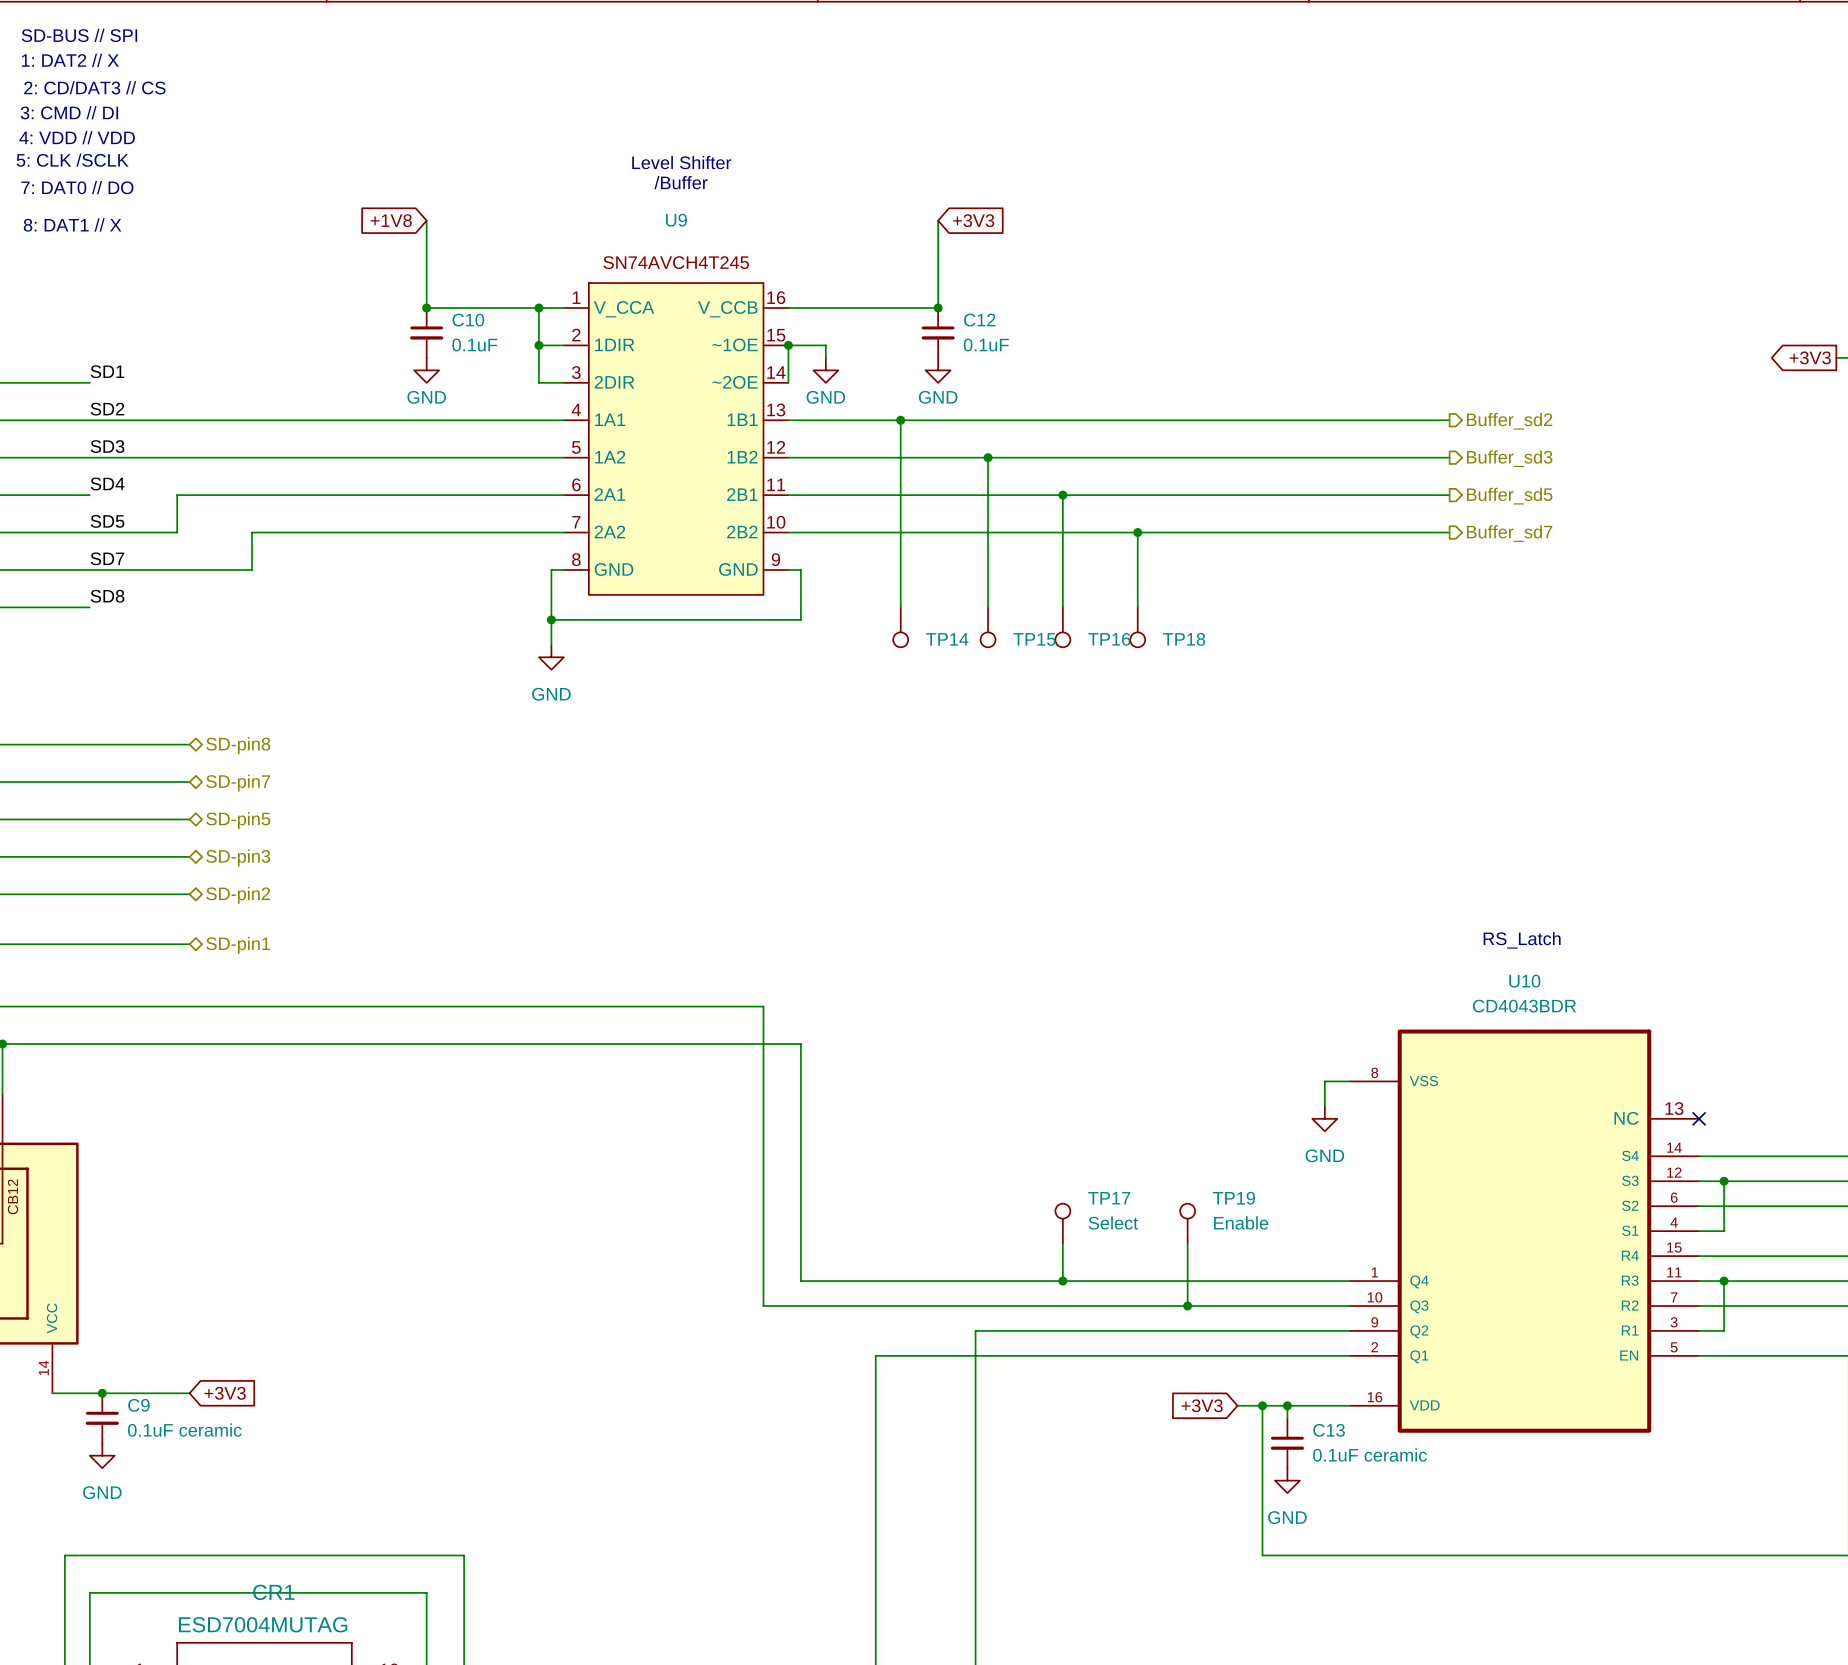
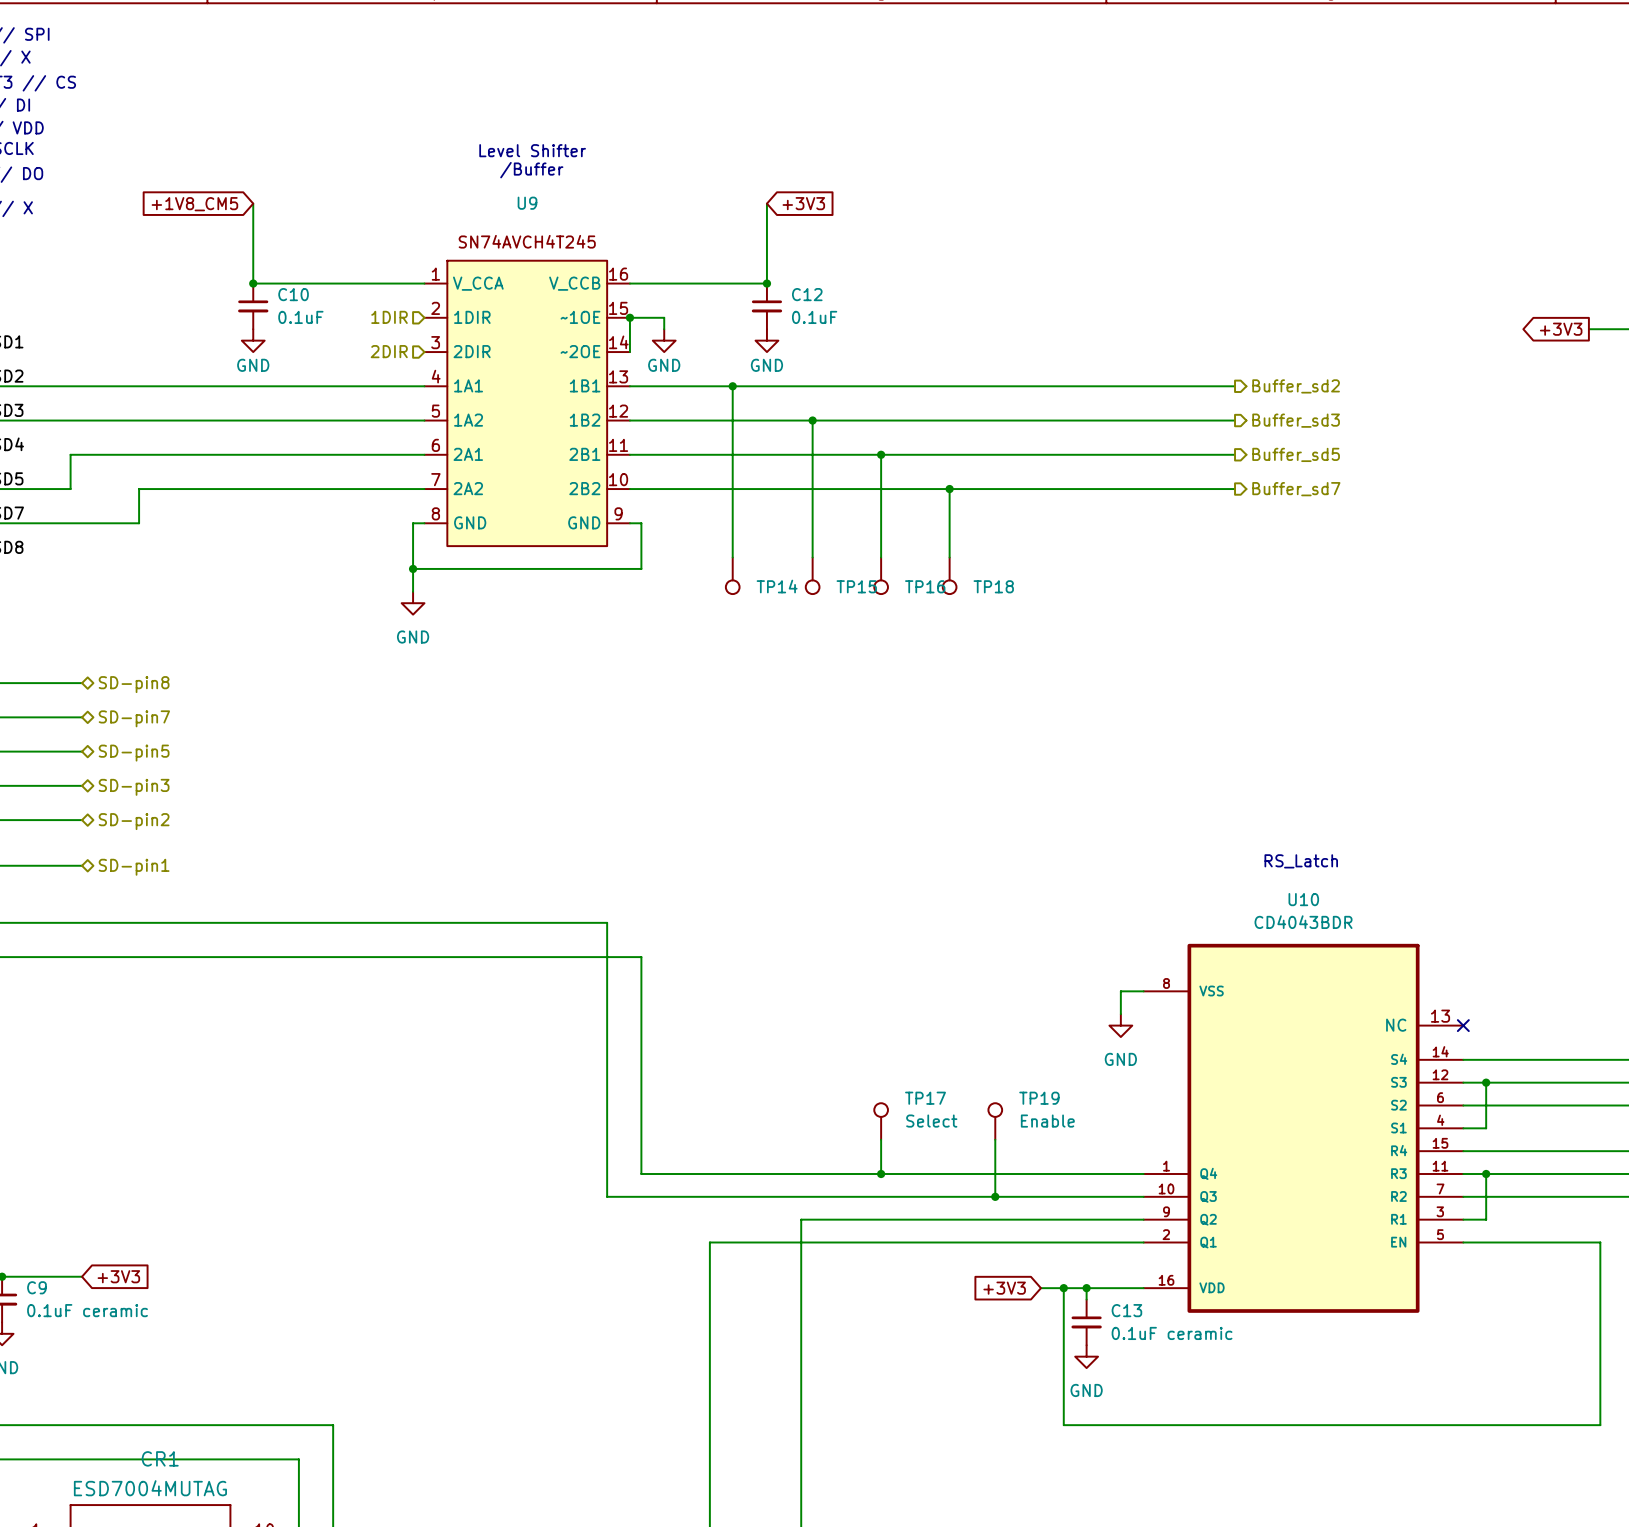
global label: +1V8 (391, 220) -> +1V8_CM5 (194, 204)
wire: (426, 220) (426, 307) -> (253, 203) (253, 283) (298, 283)
junction position: (426, 307) -> (253, 283)
wire: (538, 307) (538, 382) (563, 382) -> none
junction: (538, 307) -> none
C10 position: (426, 332) -> (253, 306)
hierarchical label: none -> 1DIR (389, 317)
wire: (538, 345) (563, 345) -> none
junction: (538, 345) -> none
power symbol position: GND (426, 370) -> GND (253, 340)
hierarchical label: none -> 2DIR (389, 351)

